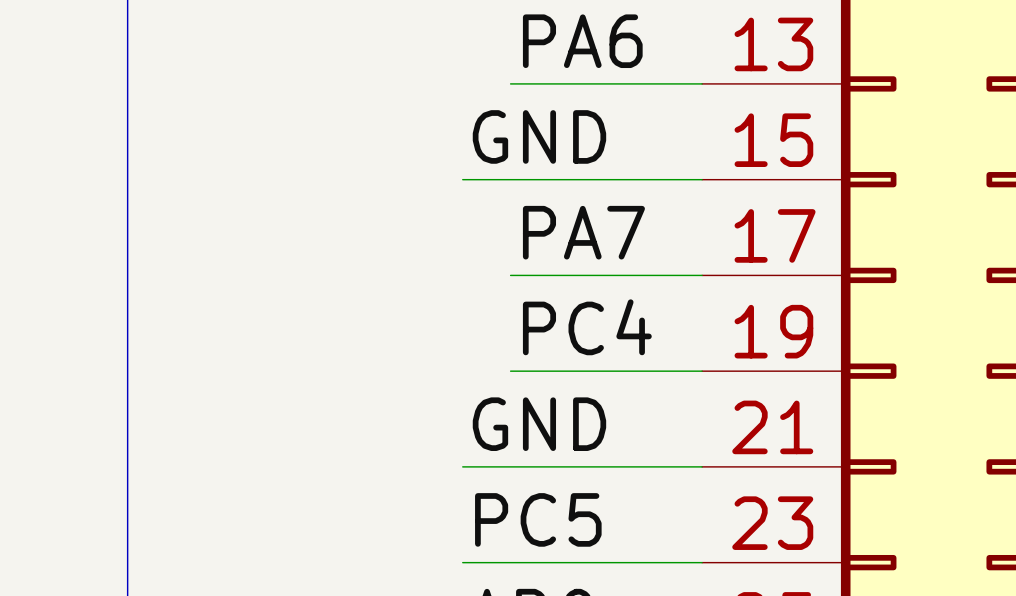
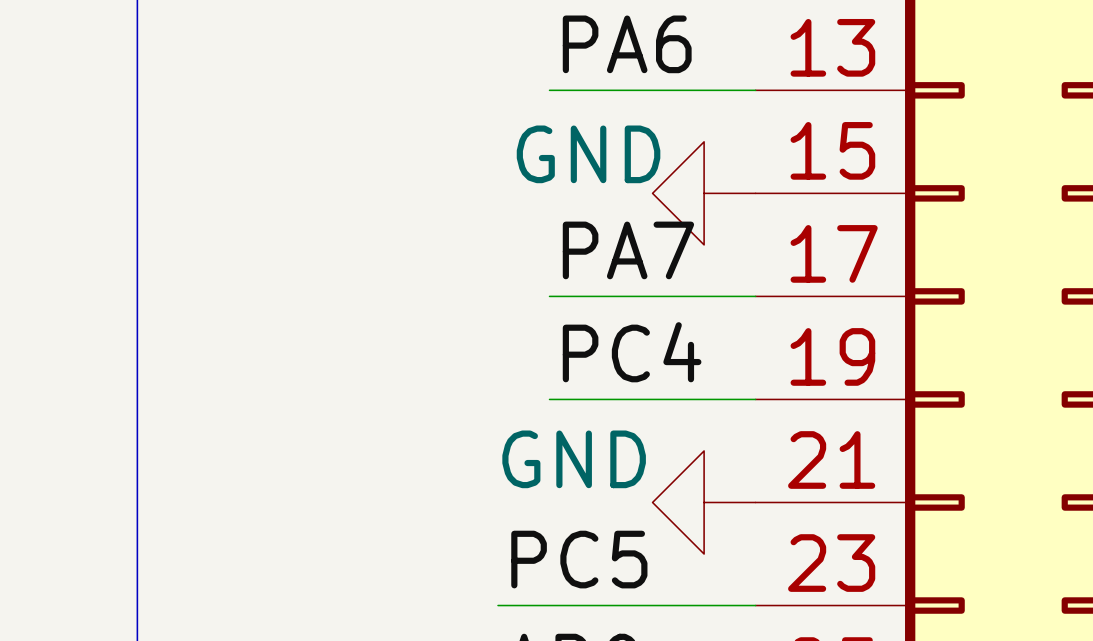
label: GND (539, 136) -> none
wire: (462, 179) (702, 179) -> none
power symbol: none -> GND (704, 193)
label: GND (539, 424) -> none
wire: (462, 466) (702, 466) -> none
power symbol: none -> GND (704, 502)

